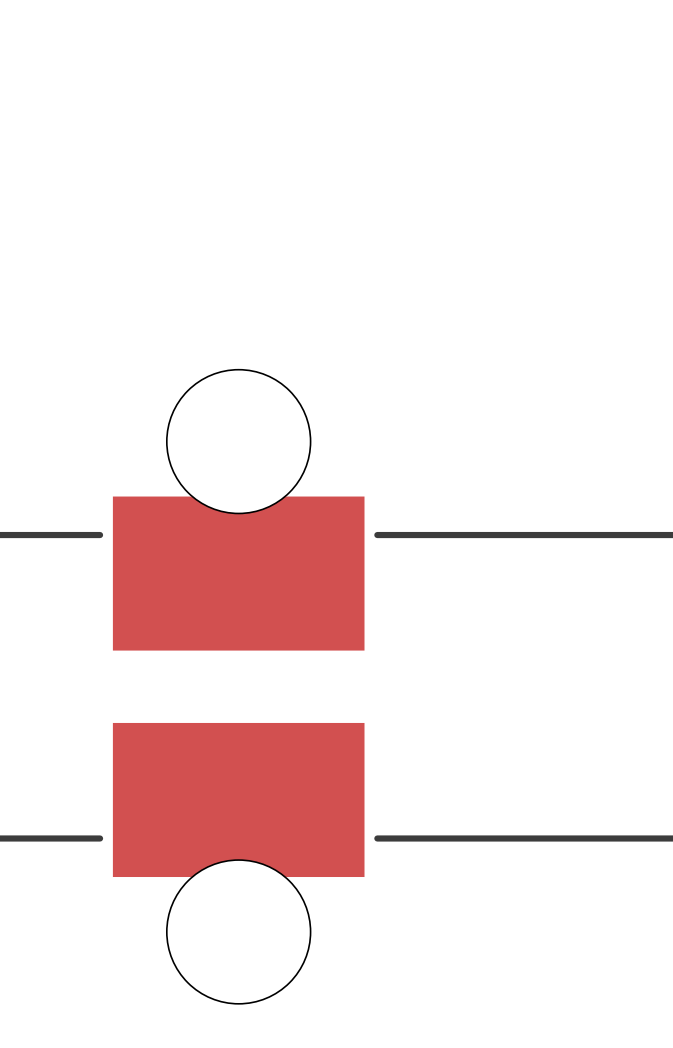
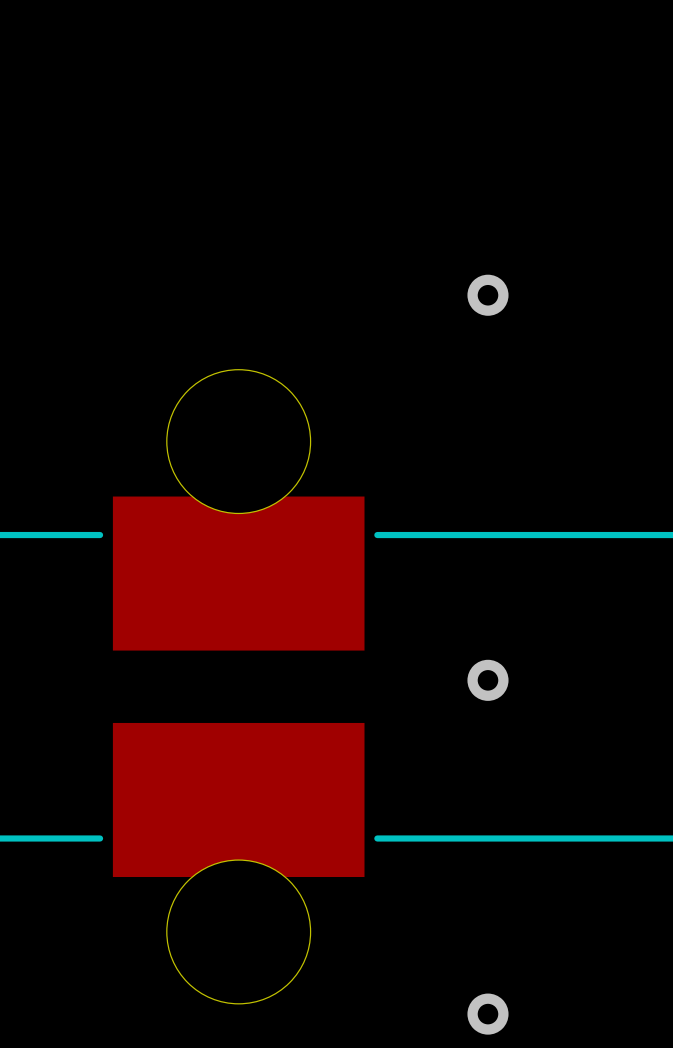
via: none -> (487, 295)
via: none -> (487, 680)
via: none -> (487, 1014)

